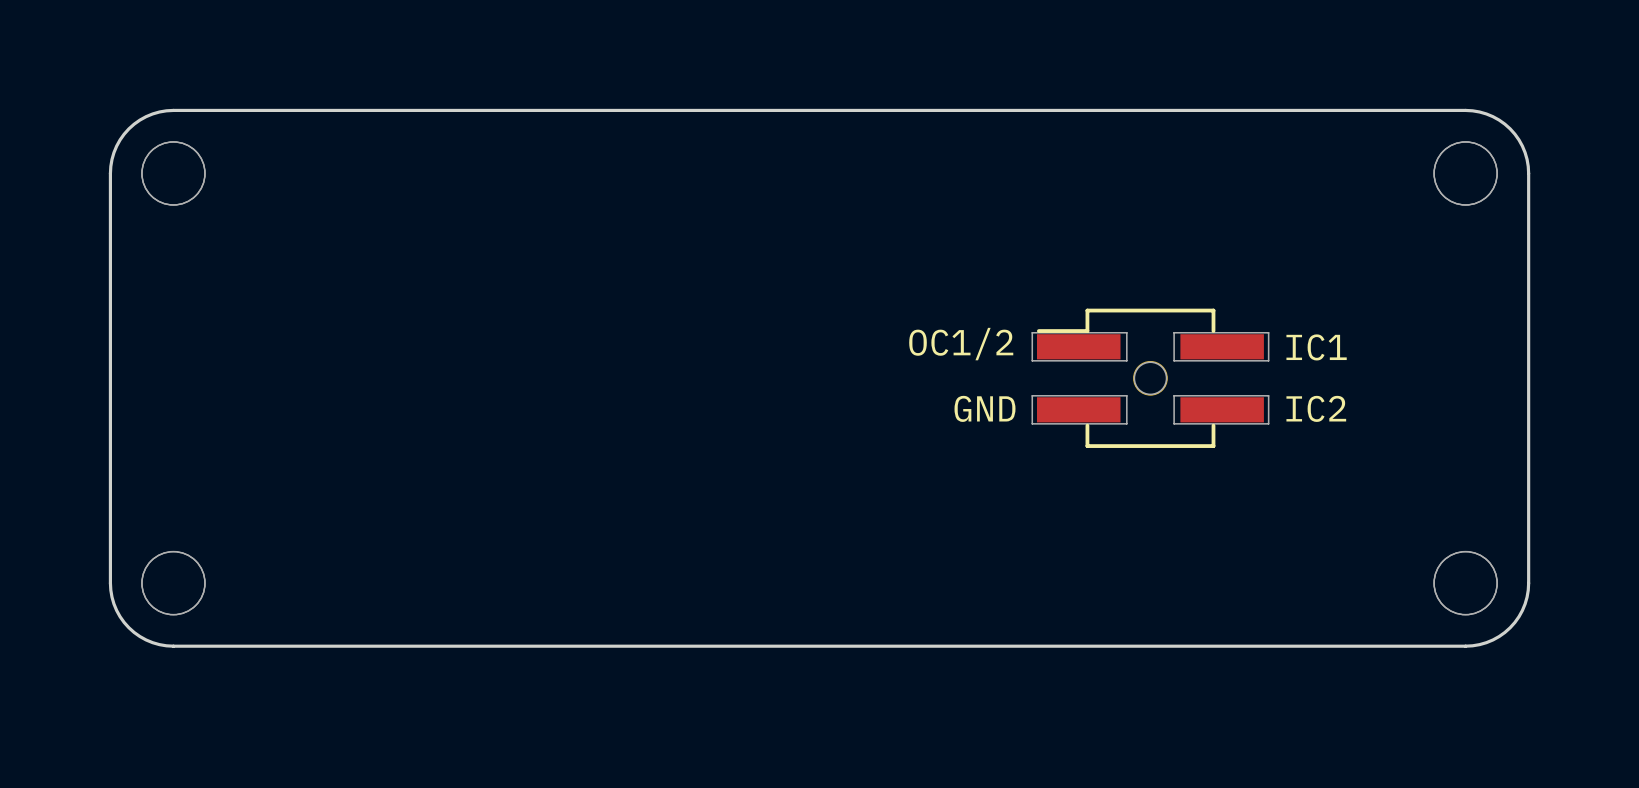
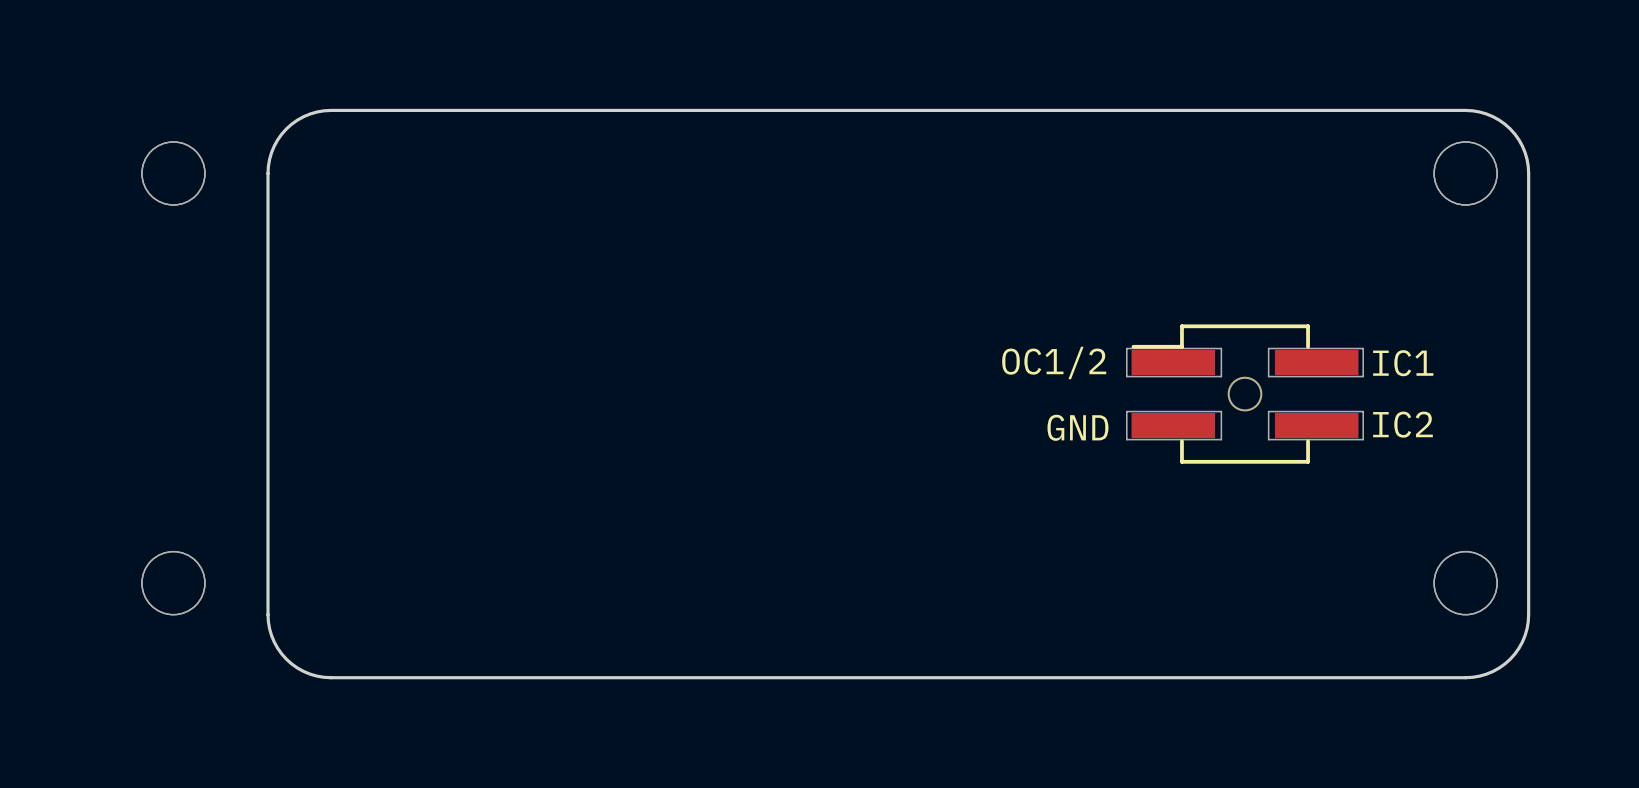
board edge: (331, 110) (159, 112) (146, 116) (134, 124) (120, 139) (113, 152) (110, 173) (110, 590) (113, 603) (124, 622) (139, 636) (152, 642) (173, 646) (1465, 646) (1486, 642) (1499, 636) (1510, 627) (1518, 616) (1525, 603) (1528, 583) -> (331, 110) (310, 113) (297, 120) (286, 128) (274, 146) (269, 159) (268, 173) (268, 621) (274, 642) (281, 653) (291, 663) (310, 674) (331, 677) (1472, 677) (1486, 674) (1499, 668) (1510, 659) (1518, 648) (1525, 635) (1528, 621) (1528, 583)
text position: OC1/2 (961, 344) -> OC1/2 (1054, 362)
text position: IC1 (1316, 347) -> IC1 (1403, 363)
line: (1126, 348) (1126, 332) (1032, 332) (1032, 360) (1126, 360) -> (1126, 348) (1221, 348) (1221, 376) (1126, 376) (1126, 360)
line: (1268, 348) (1268, 332) (1174, 332) (1174, 360) (1268, 360) -> (1268, 348) (1363, 348) (1363, 376) (1268, 376) (1268, 360)
part position: (1150, 378) -> (1245, 394)
drawing position: (1150, 378) -> (1245, 394)
text position: GND (985, 408) -> GND (1077, 427)
text position: IC2 (1316, 408) -> IC2 (1402, 424)
line: (1126, 411) (1126, 395) (1032, 395) (1032, 423) (1126, 423) -> (1126, 411) (1221, 411) (1221, 439) (1126, 439) (1126, 423)
line: (1268, 411) (1268, 395) (1174, 395) (1174, 423) (1268, 423) -> (1268, 411) (1363, 411) (1363, 439) (1268, 439) (1268, 423)

